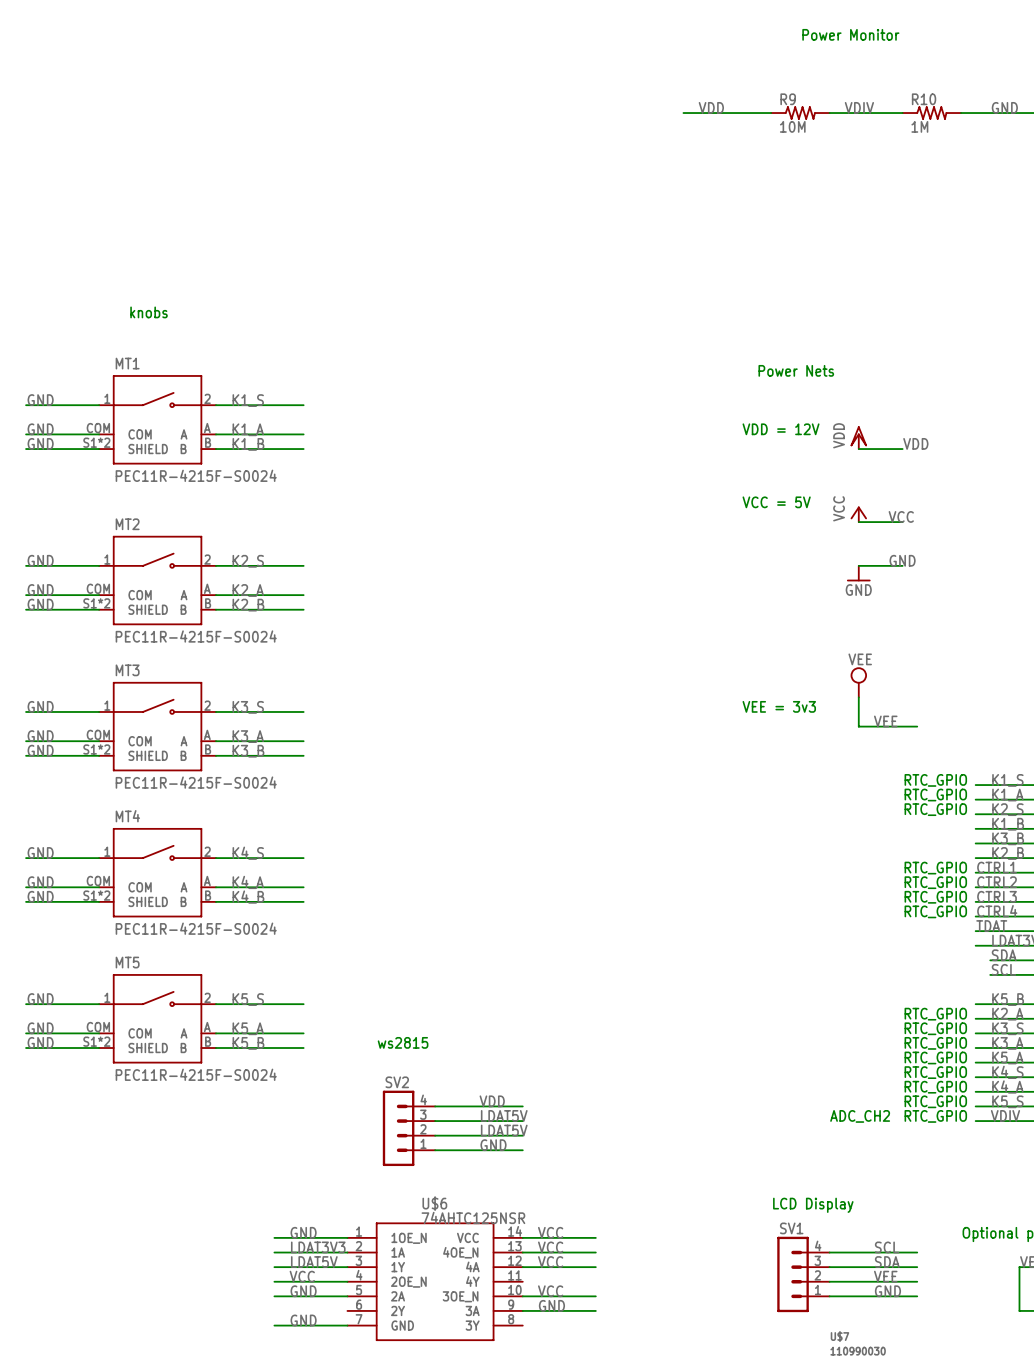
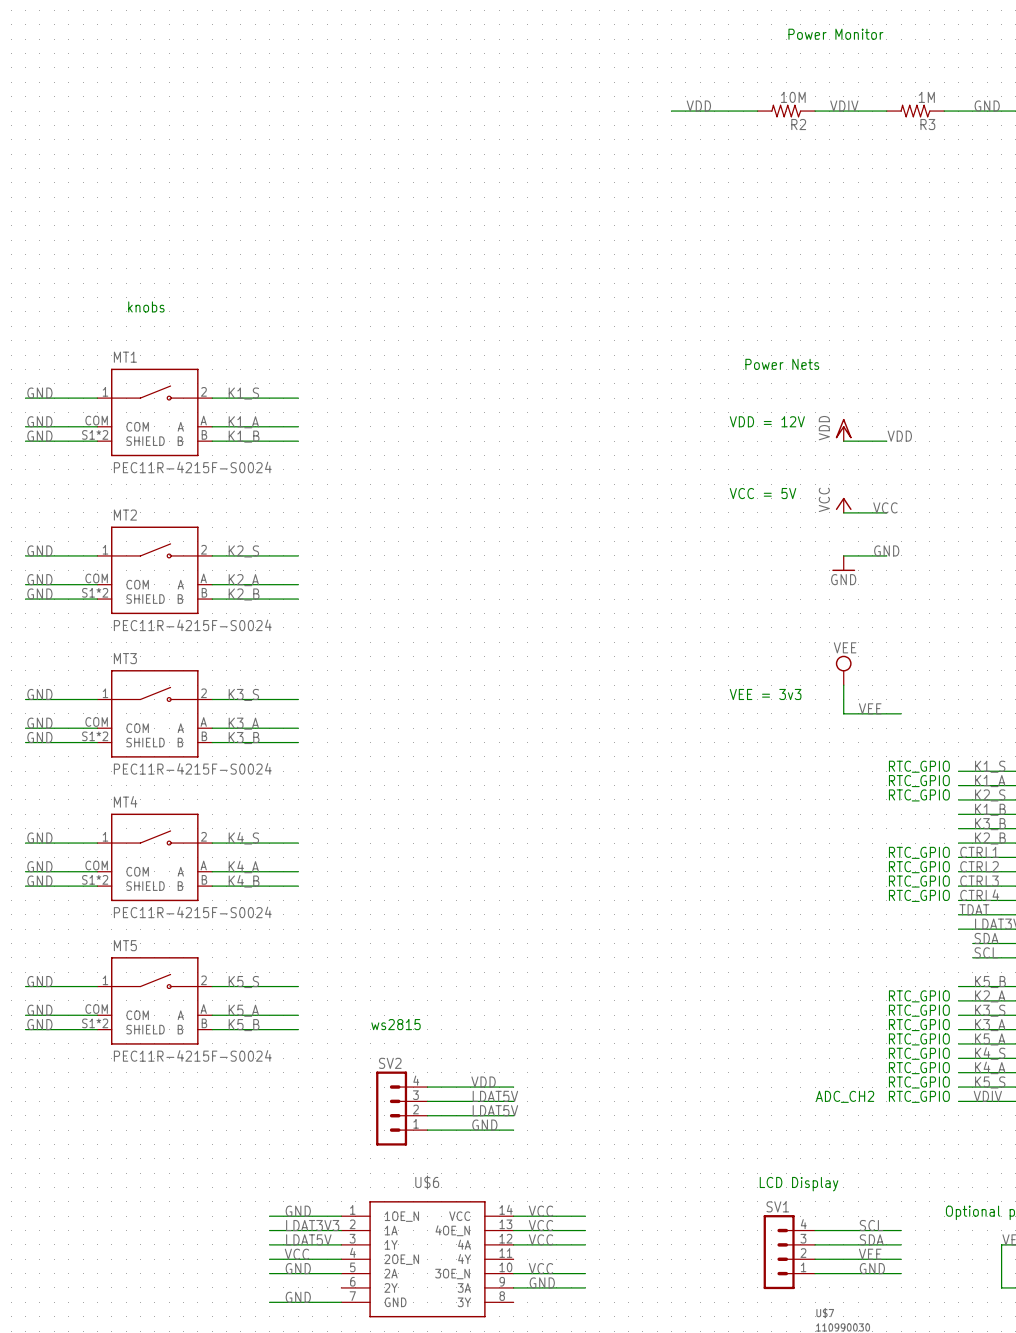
R9: 10M (800, 113) -> none
R2: none -> 10M (786, 111)
R10: 1M (931, 113) -> none
R3: none -> 1M (915, 111)
U$6 value: 74AHTC125NSR (473, 1217) -> none

